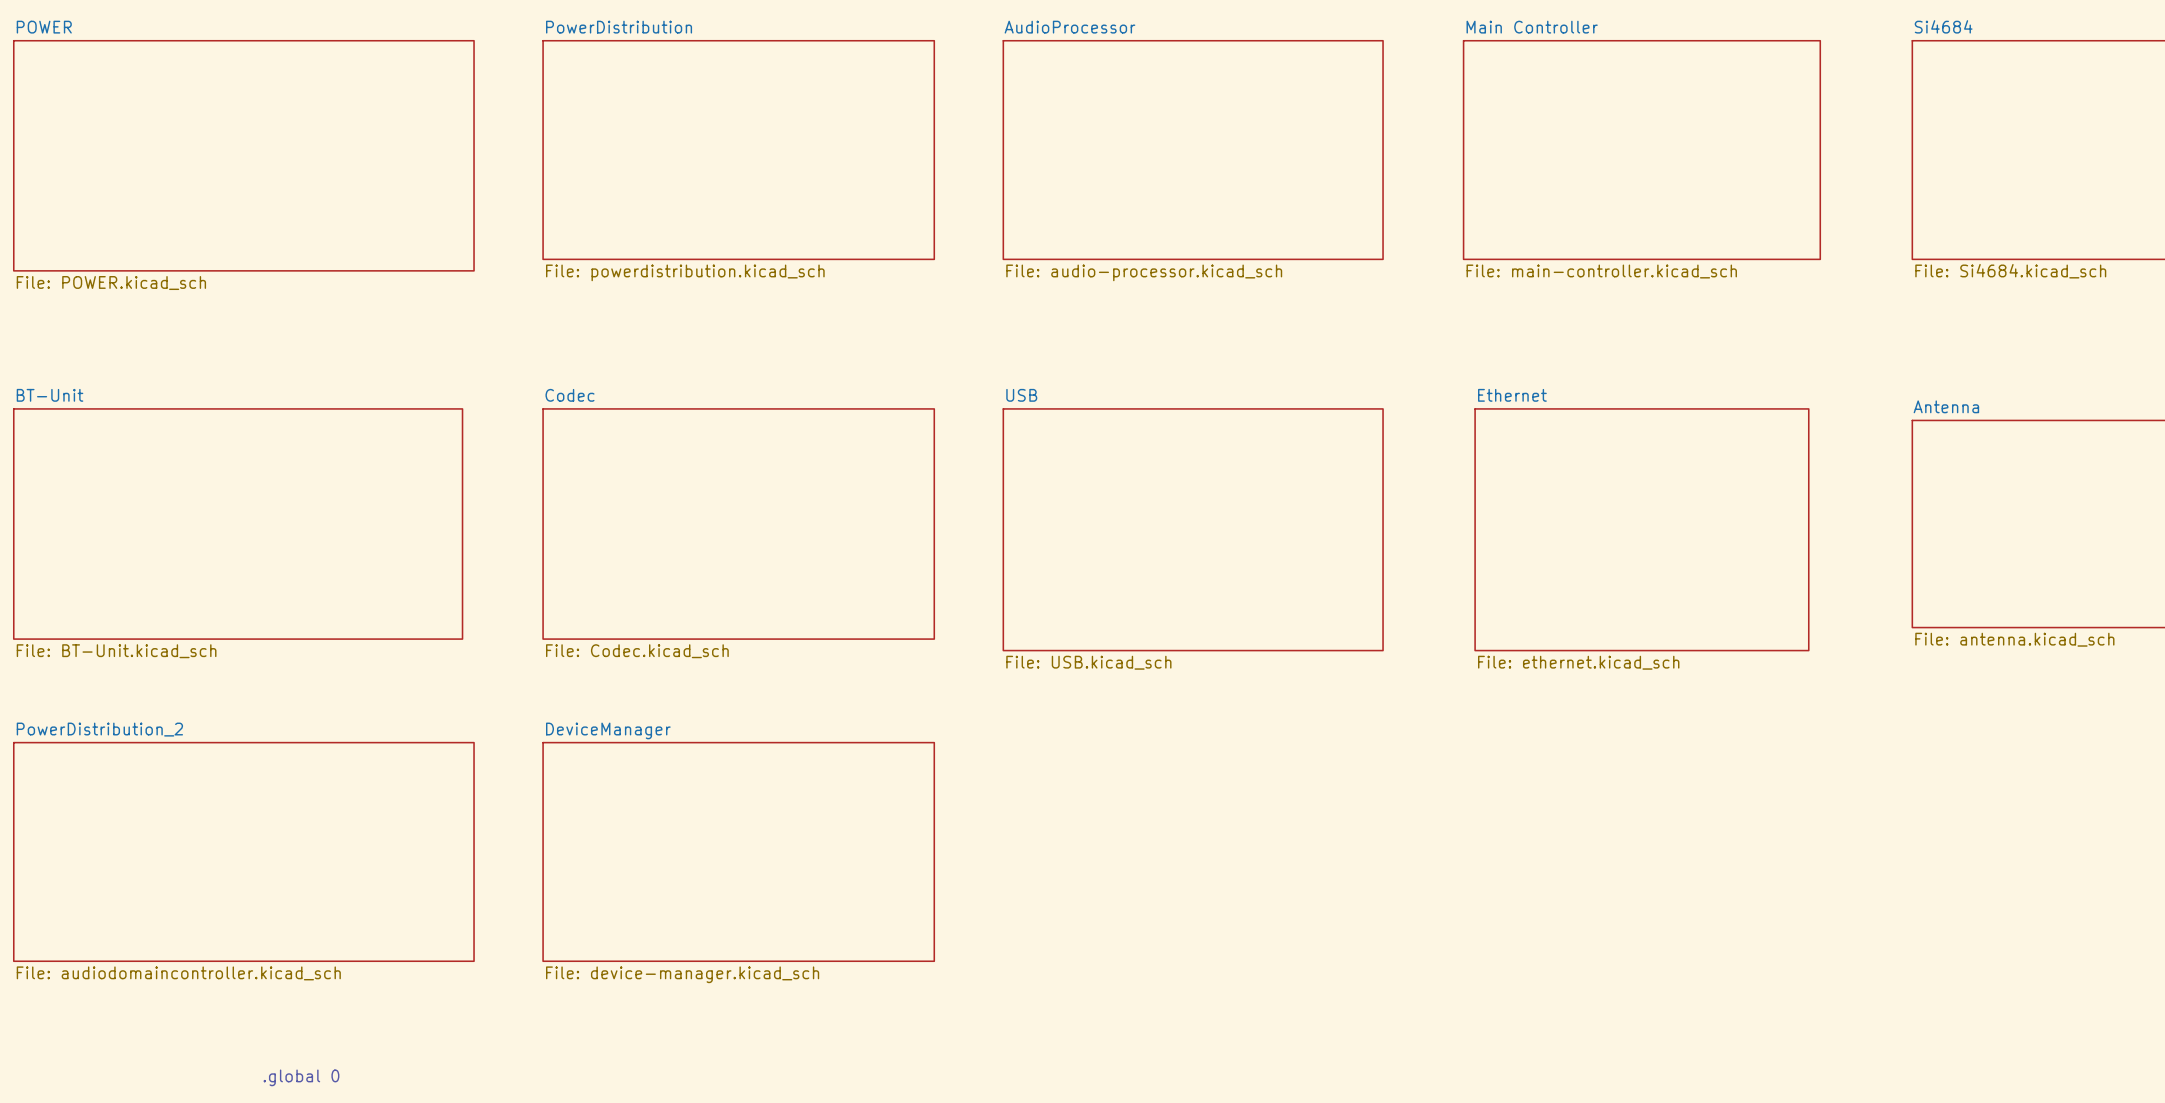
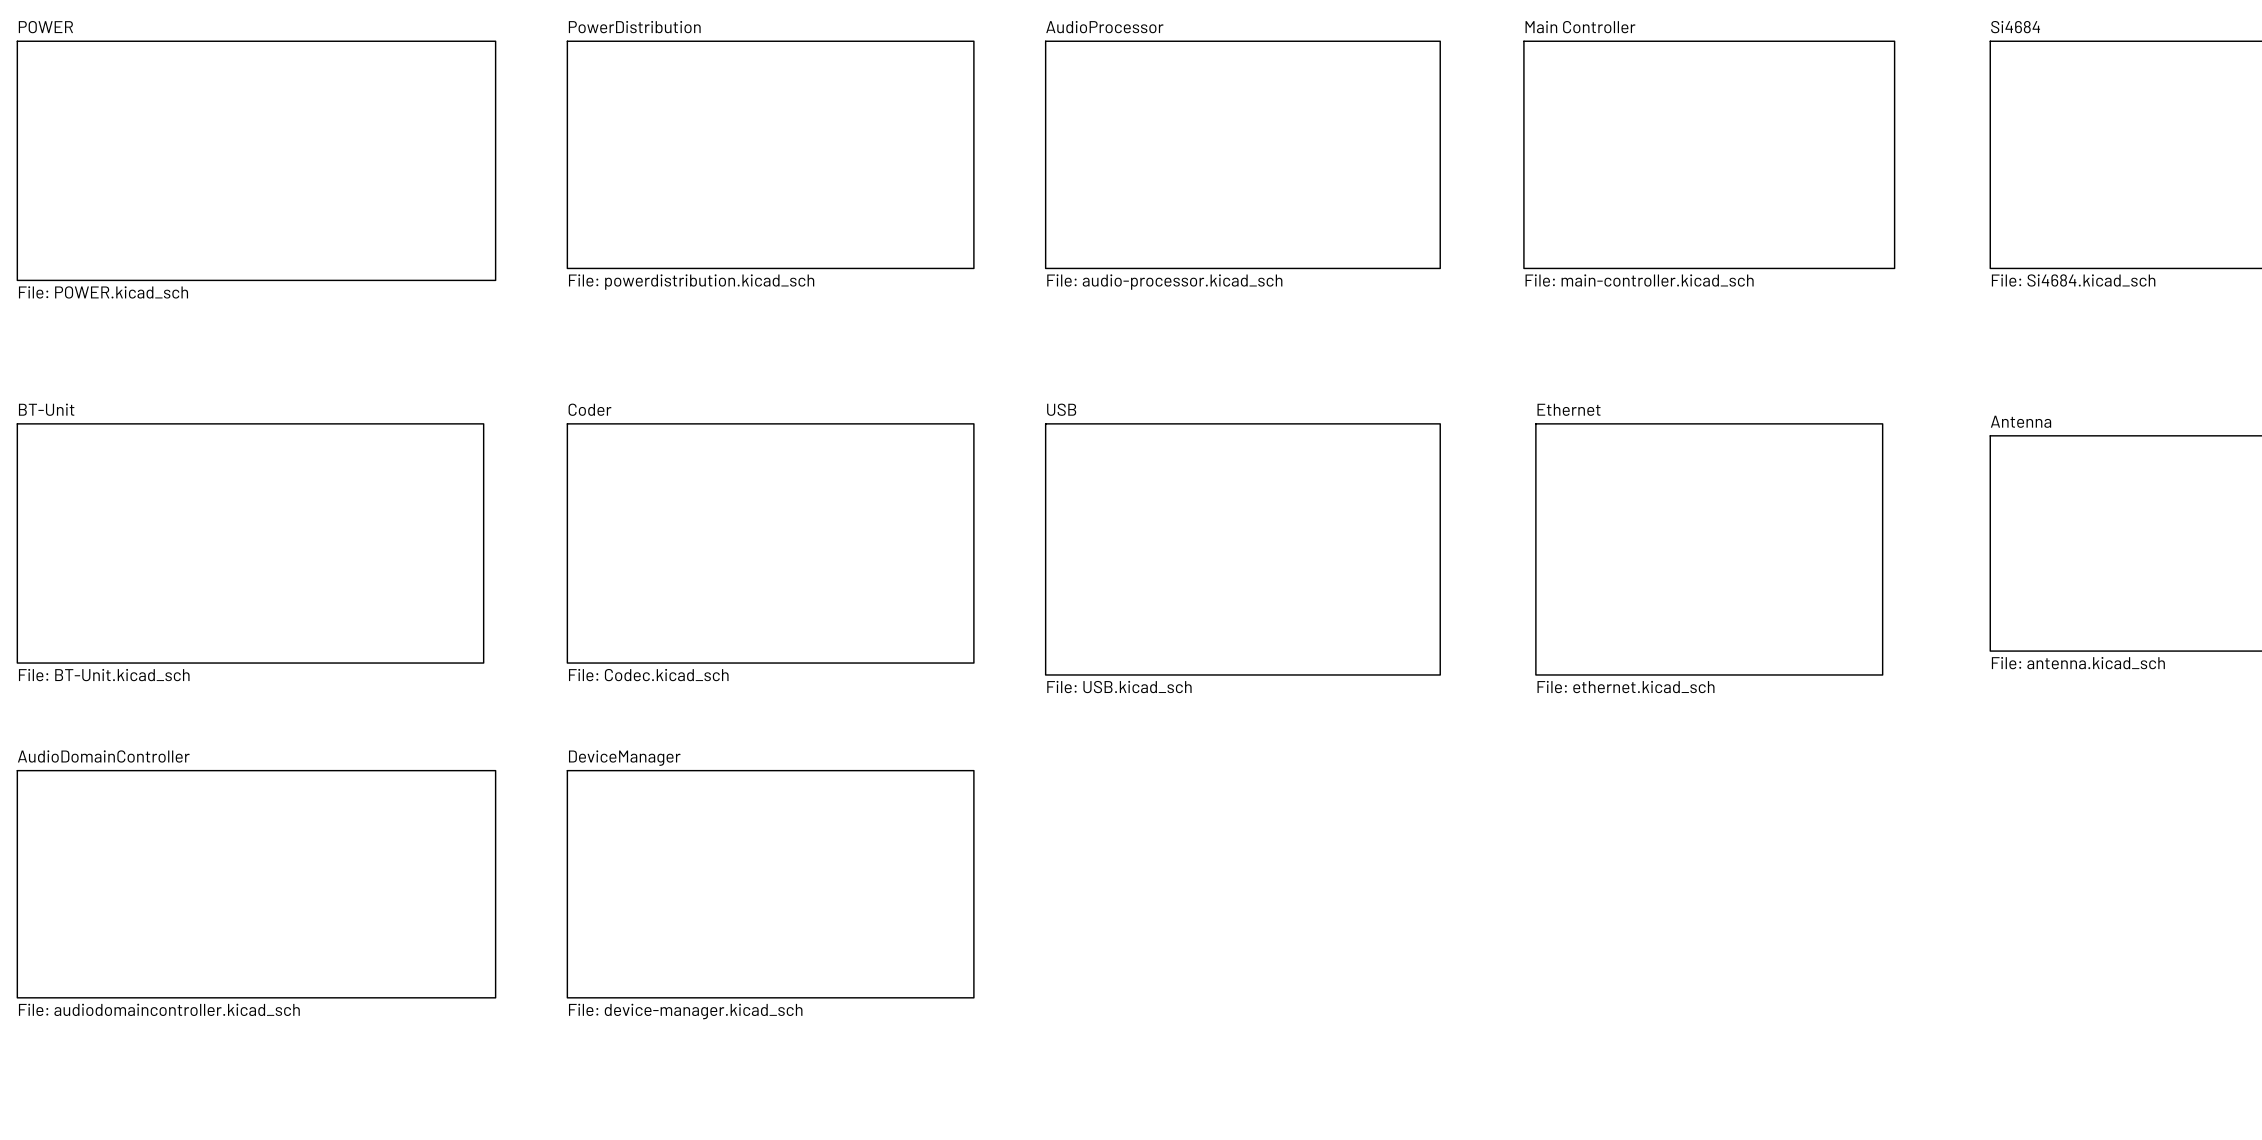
sheet Codec name: Codec (570, 395) -> Coder (590, 409)
sheet PowerDistribution_2 name: PowerDistribution_2 (99, 729) -> AudioDomainController (103, 756)
text: .global 0 (301, 1077) -> none

